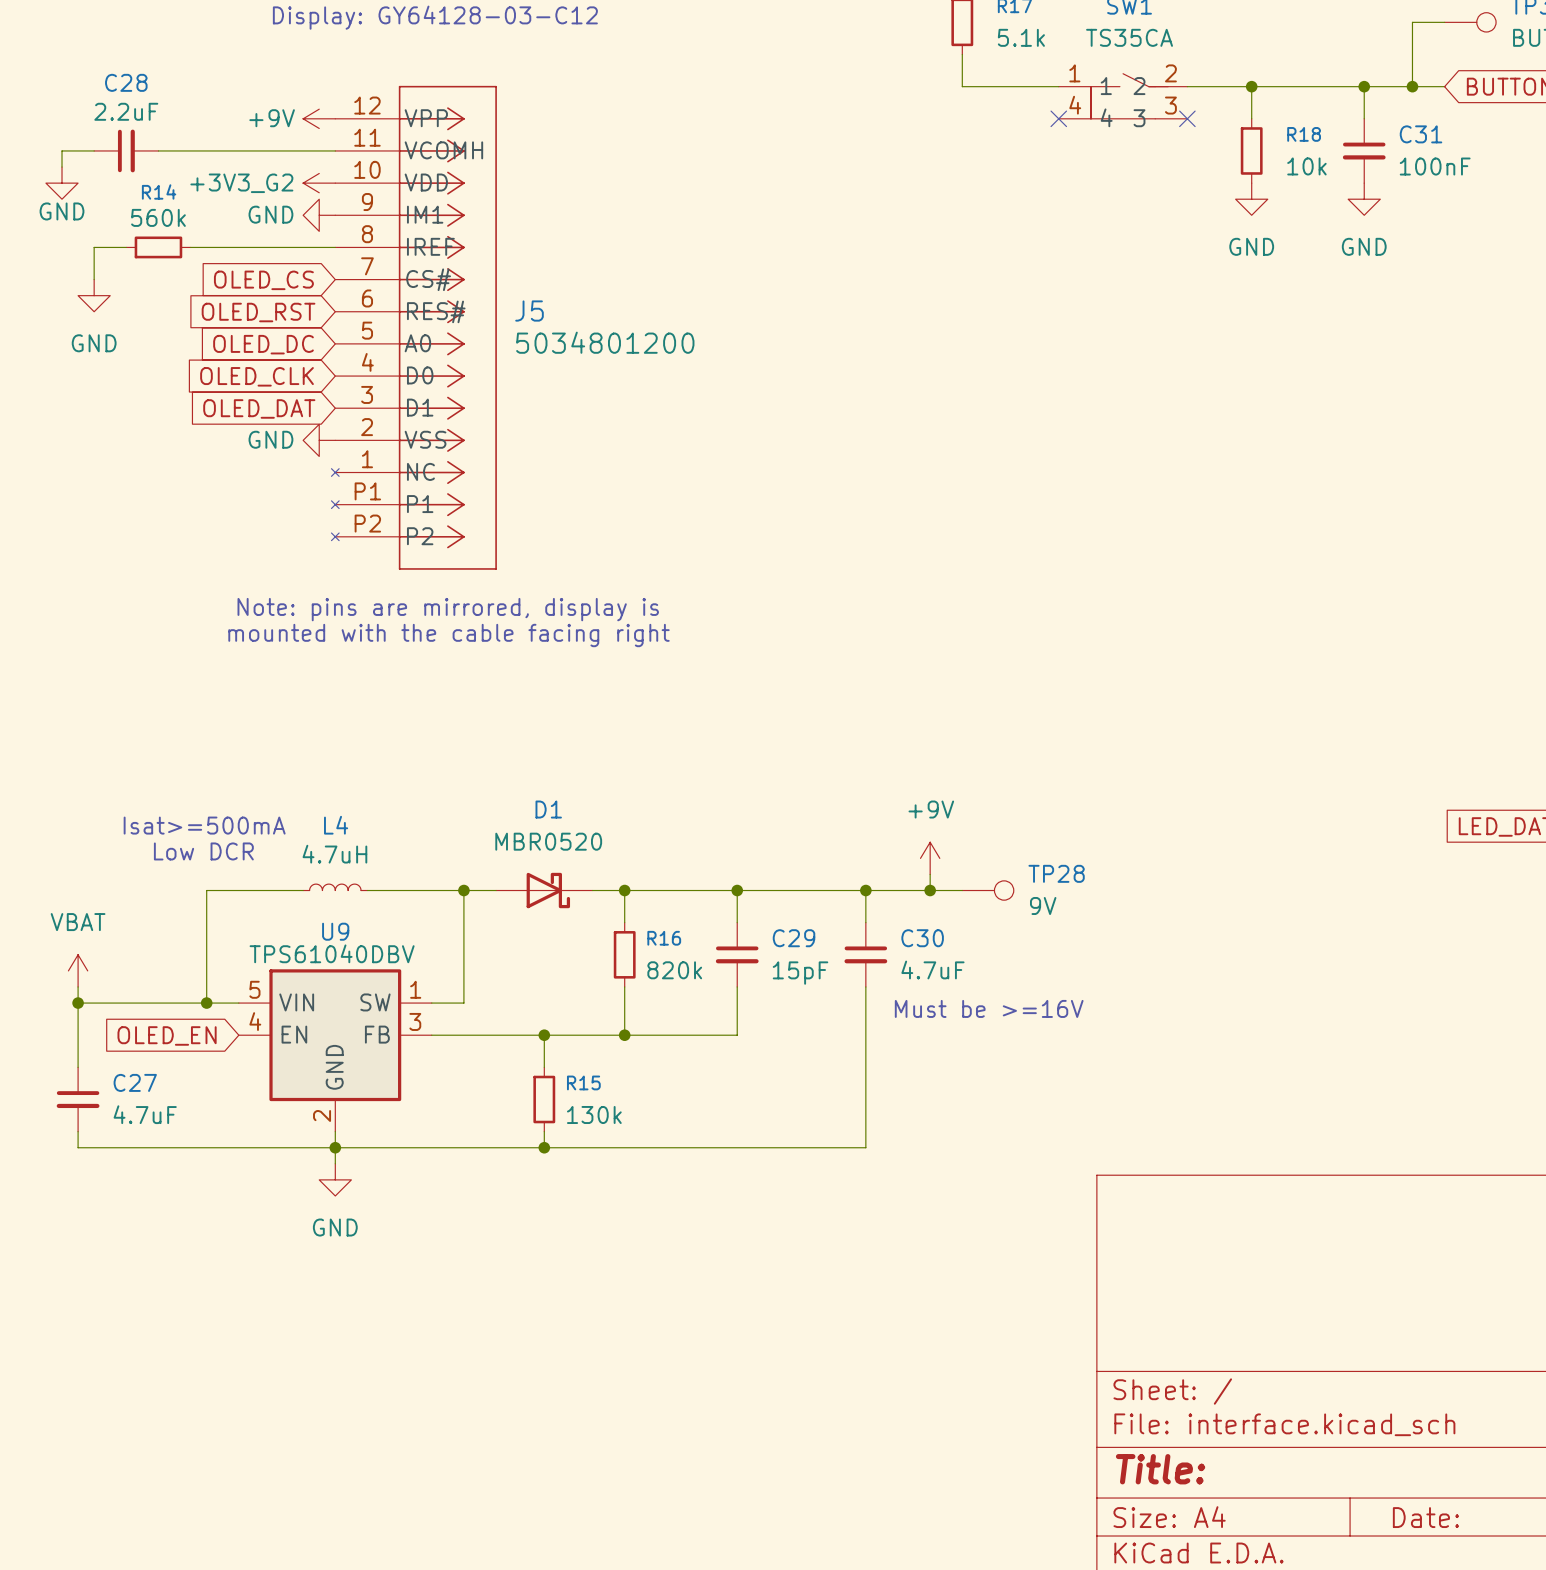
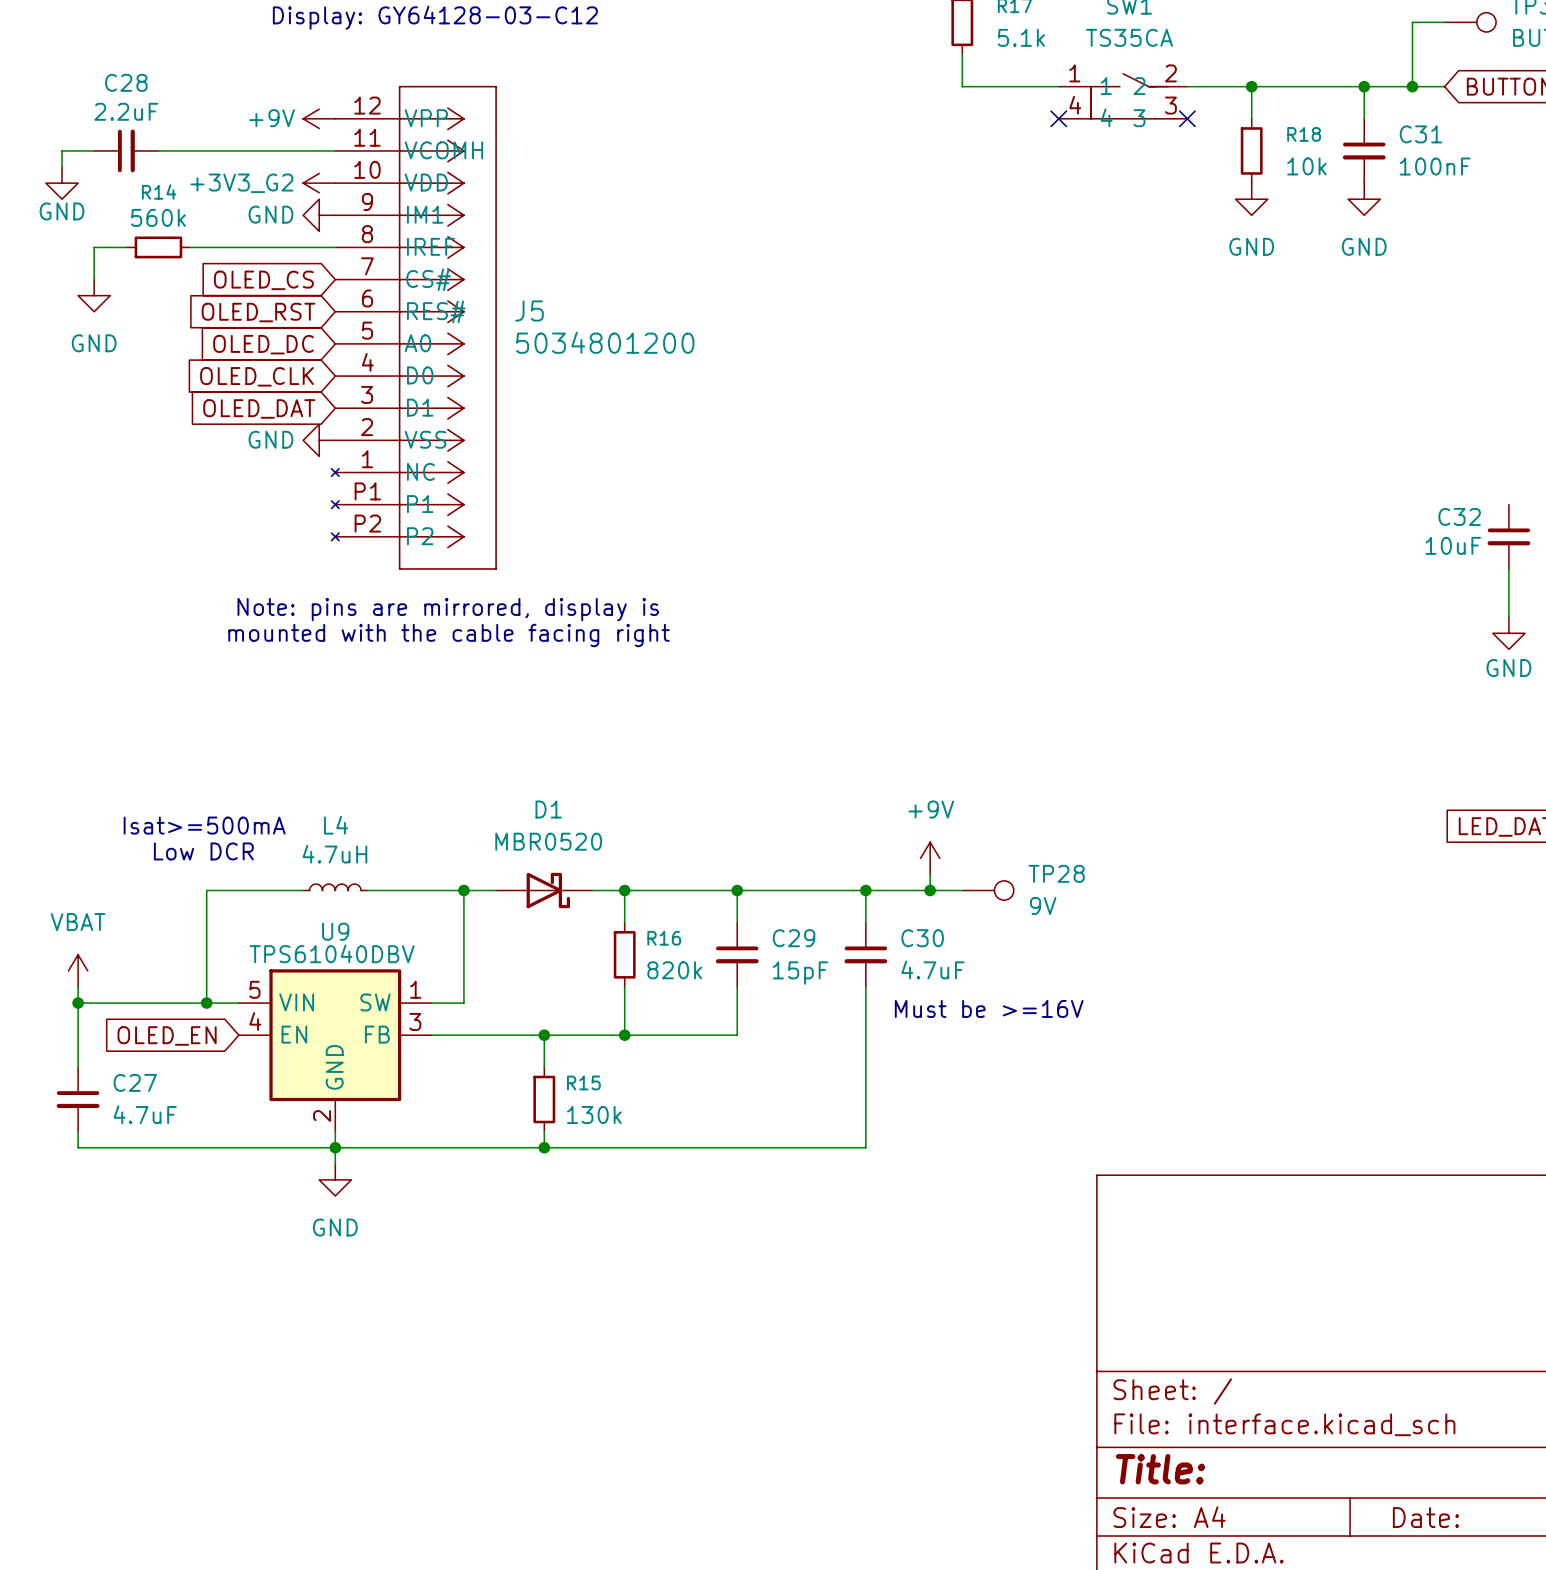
C32: none -> 10uF (1508, 536)
wire: none -> (1508, 568) (1508, 617)
power symbol: none -> GND (1508, 633)

